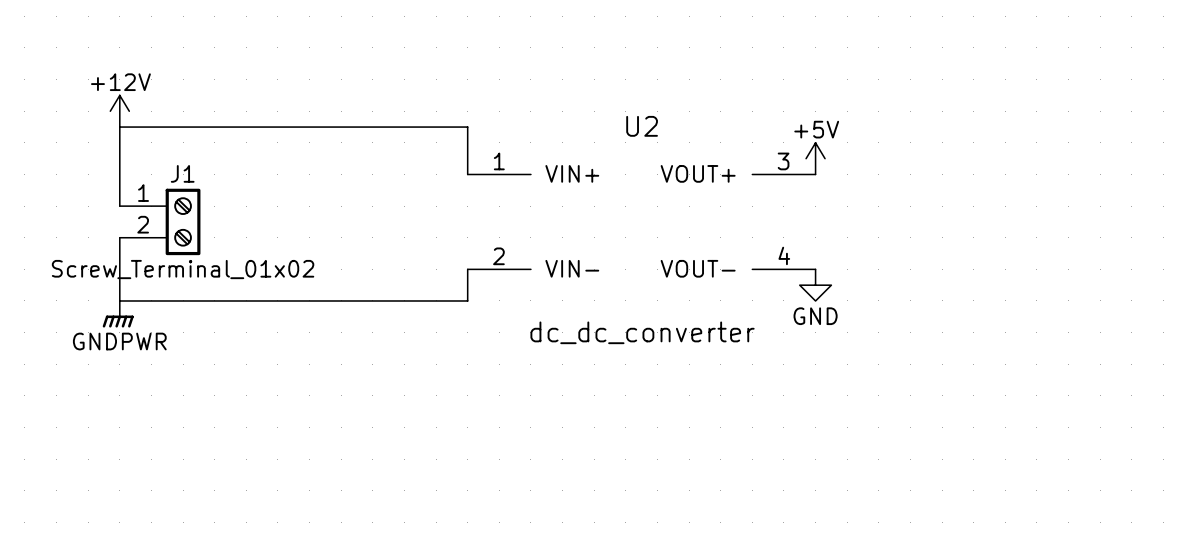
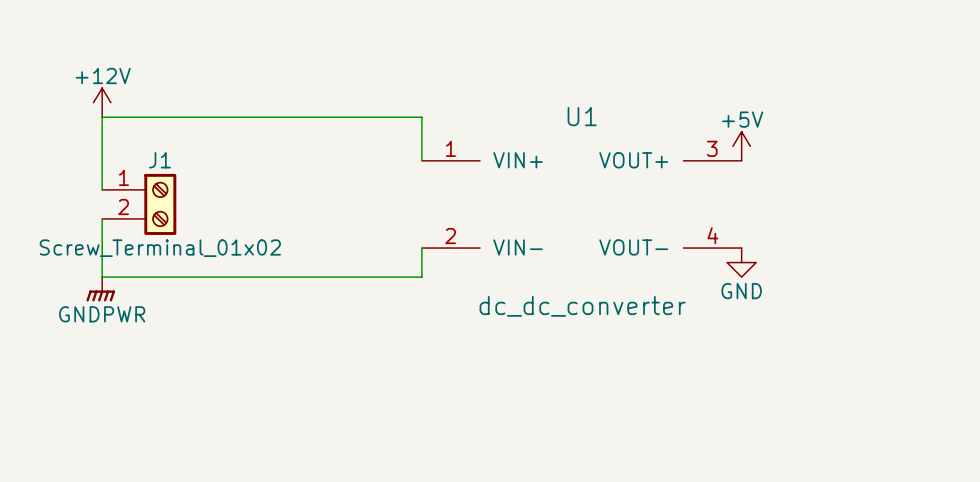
U2 name: U2 (642, 126) -> U1 (582, 116)

